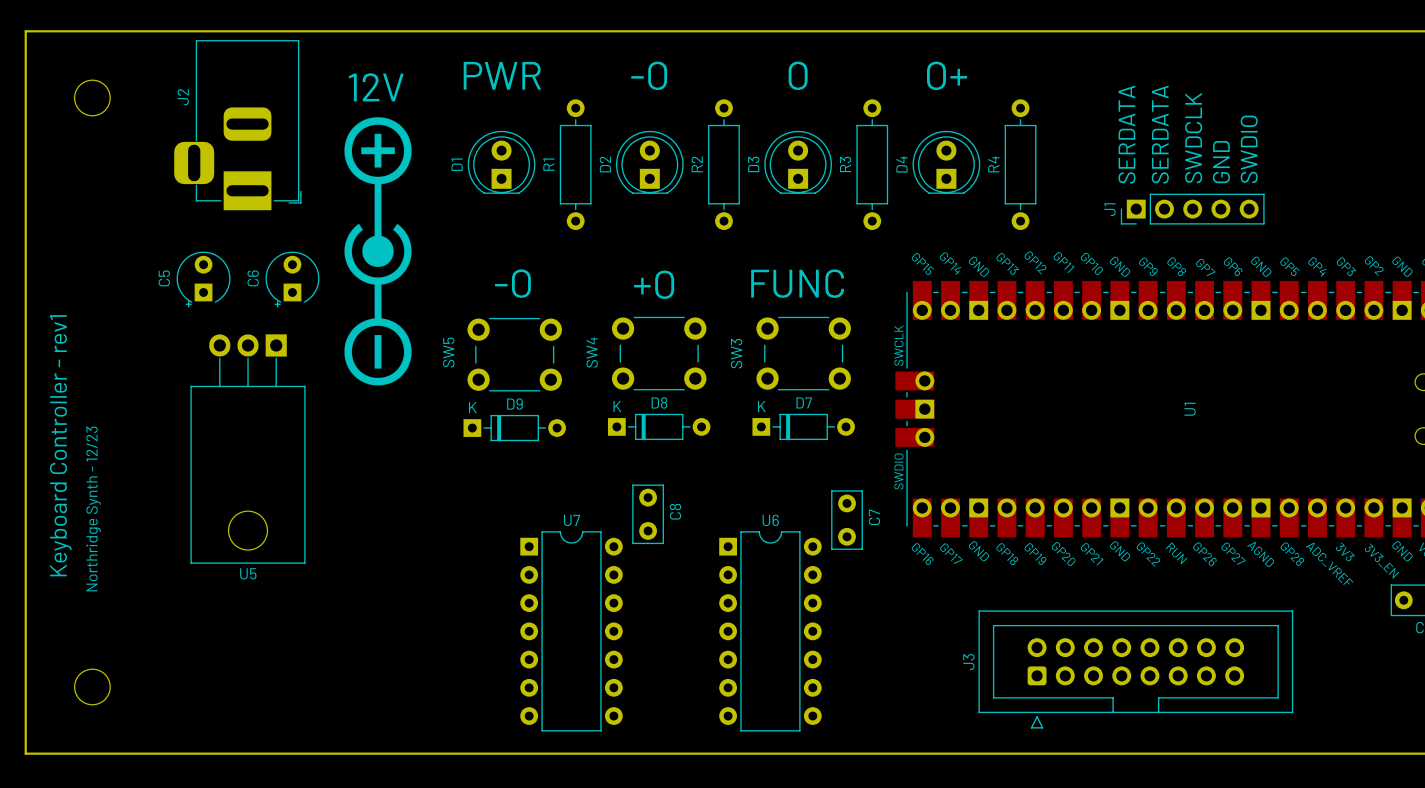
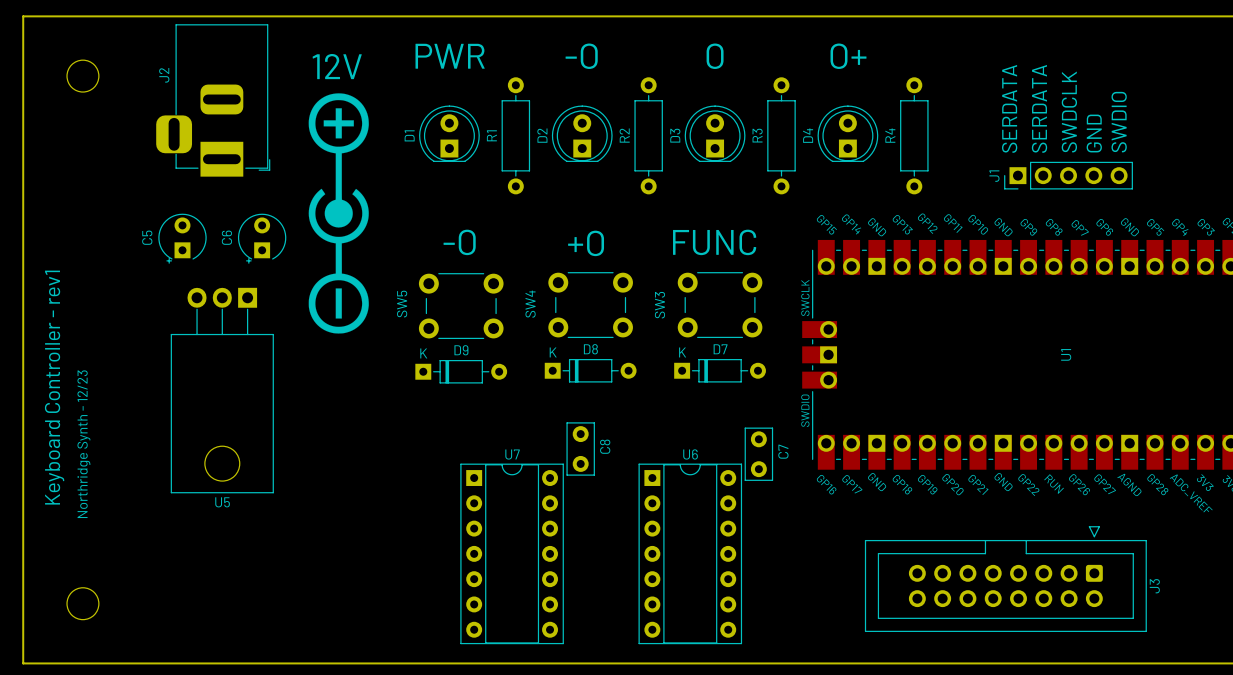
U7 footprint: [520, 531, 623, 732] -> [460, 463, 564, 645]
U6 footprint: [719, 531, 822, 732] -> [638, 463, 743, 645]
J3 rotation: 0° (1135, 669) -> 180° (1005, 579)

